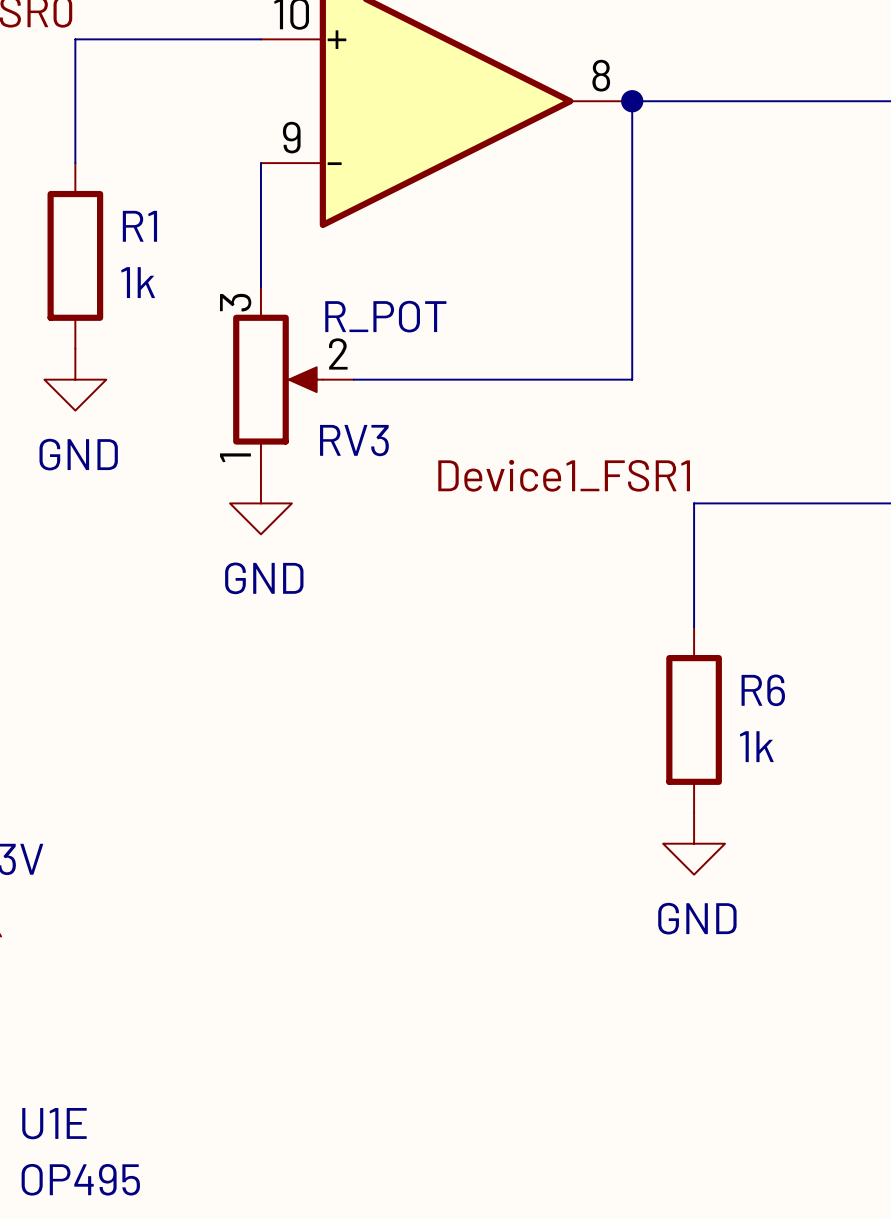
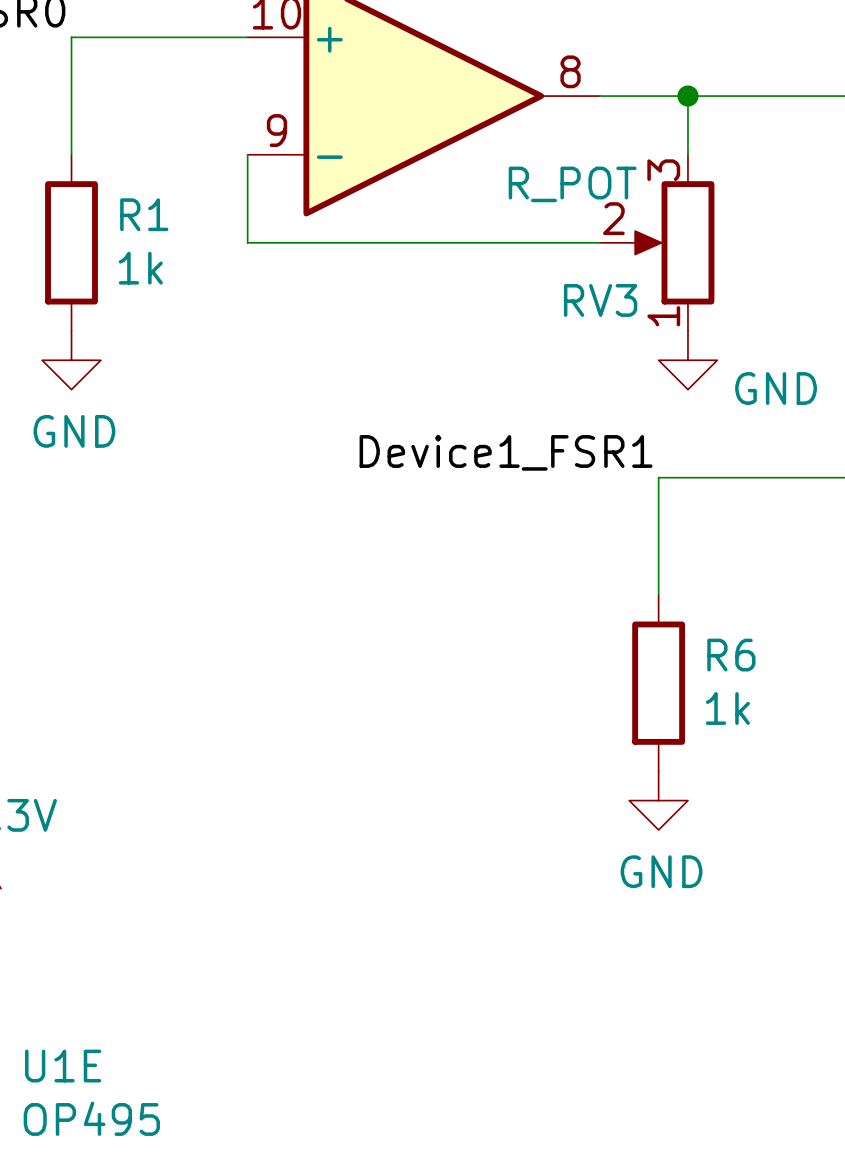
wire: (632, 101) (632, 379) (353, 379) -> none
junction position: (632, 101) -> (687, 96)
wire: none -> (687, 96) (687, 154)
wire: (260, 255) (260, 286) -> (247, 242) (599, 242)
RV3 flip: as is (277, 379) -> left-right (671, 242)
RV3 position: (293, 379) -> (657, 242)
power symbol position: GND (260, 503) -> GND (687, 360)
power symbol text position: GND (264, 578) -> GND (776, 388)

